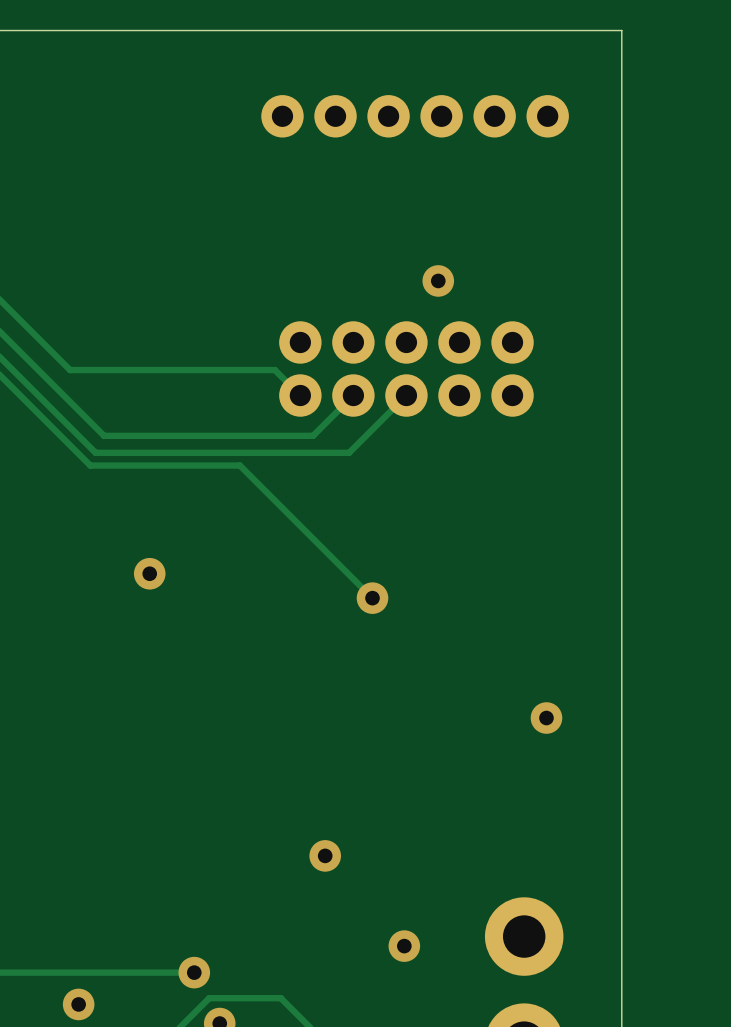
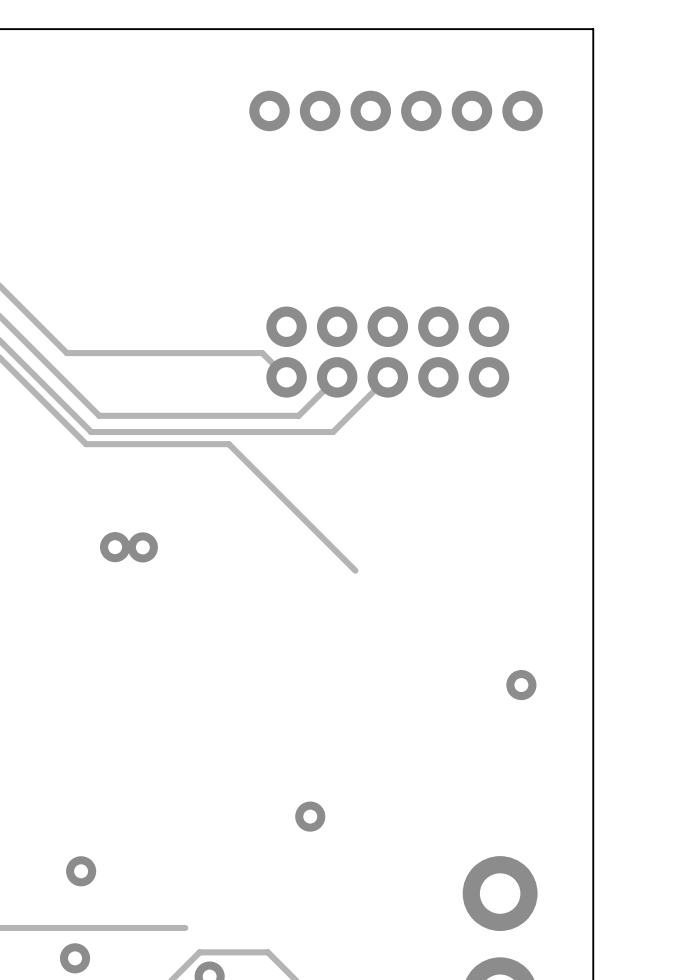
via: (438, 280) -> none
via: none -> (115, 547)
via: (372, 598) -> none
via: none -> (81, 871)
via: (404, 946) -> none
via: (194, 972) -> none

